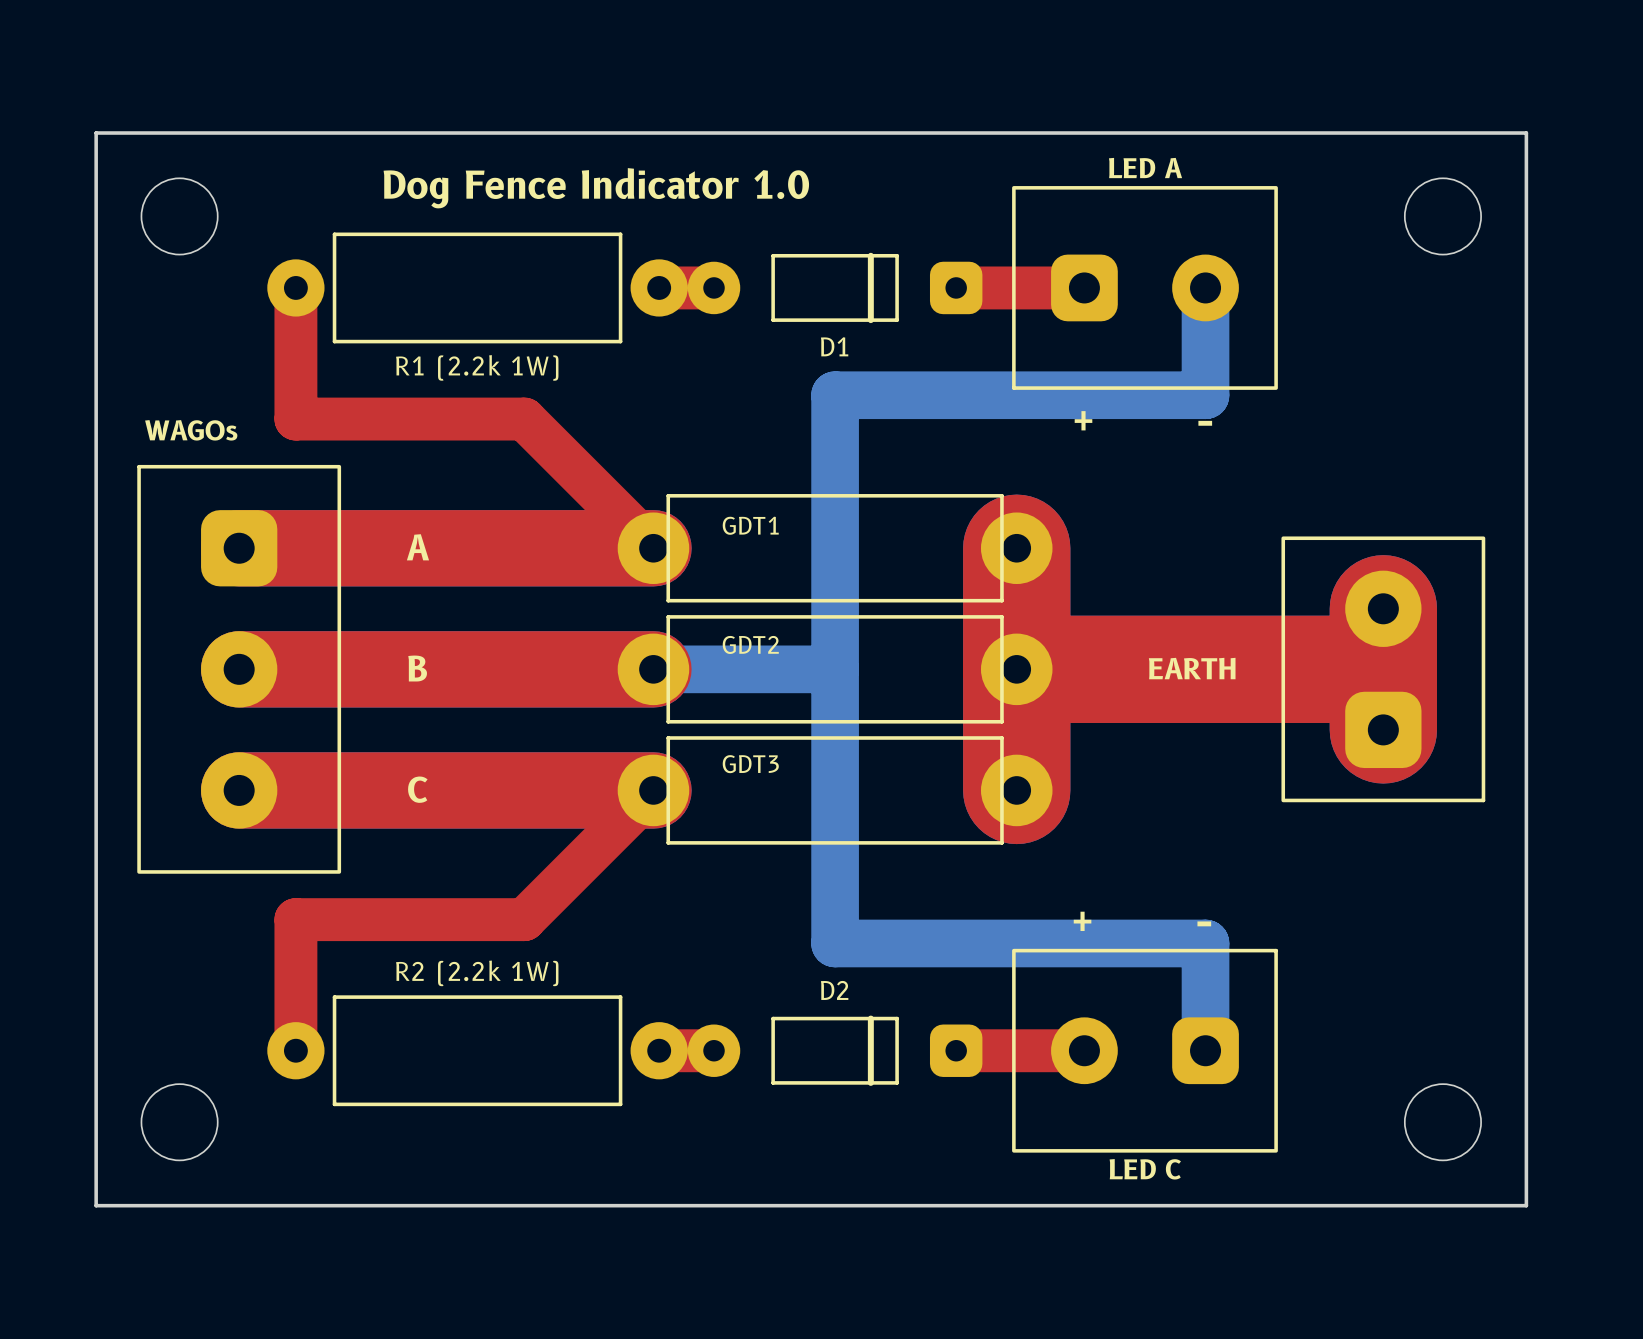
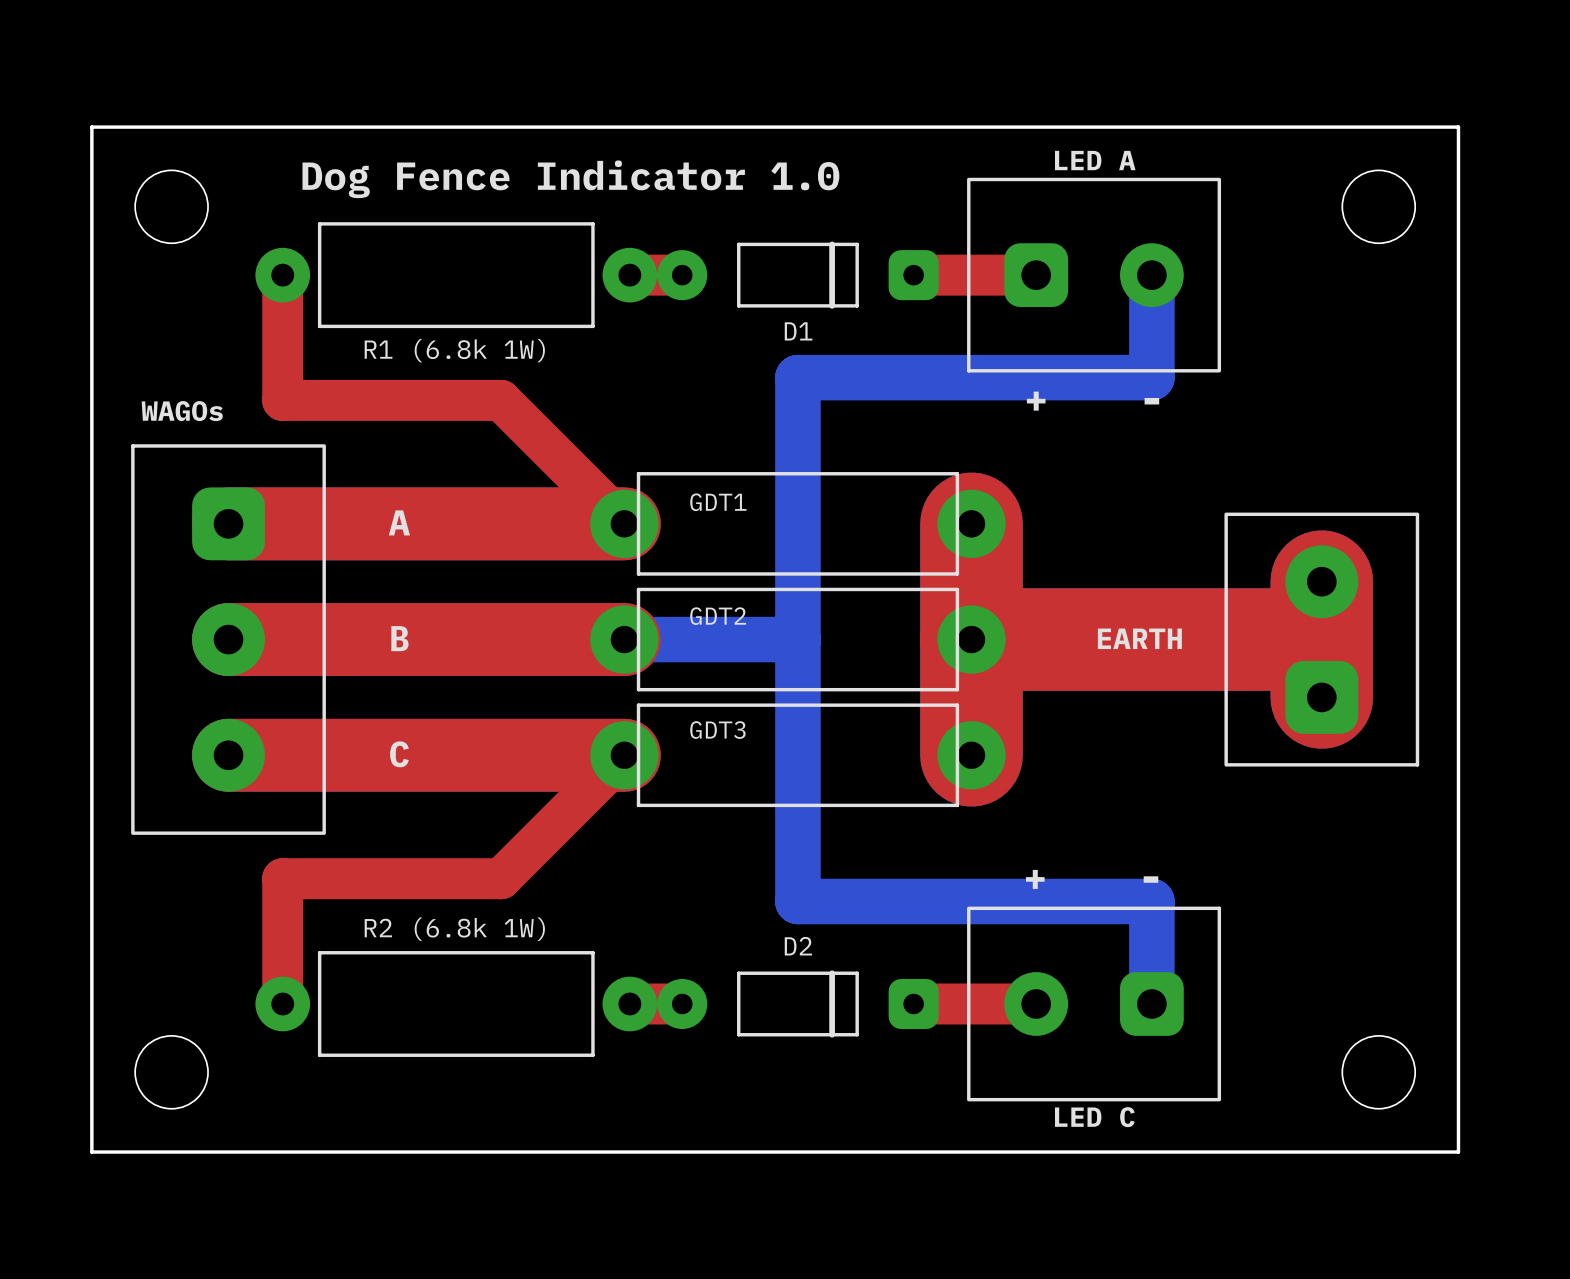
R1 (2.2k 1W) name: R1 (2.2k 1W) (477, 367) -> R1 (6.8k 1W) (454, 350)
R2 (2.2k 1W) name: R2 (2.2k 1W) (477, 973) -> R2 (6.8k 1W) (454, 929)

